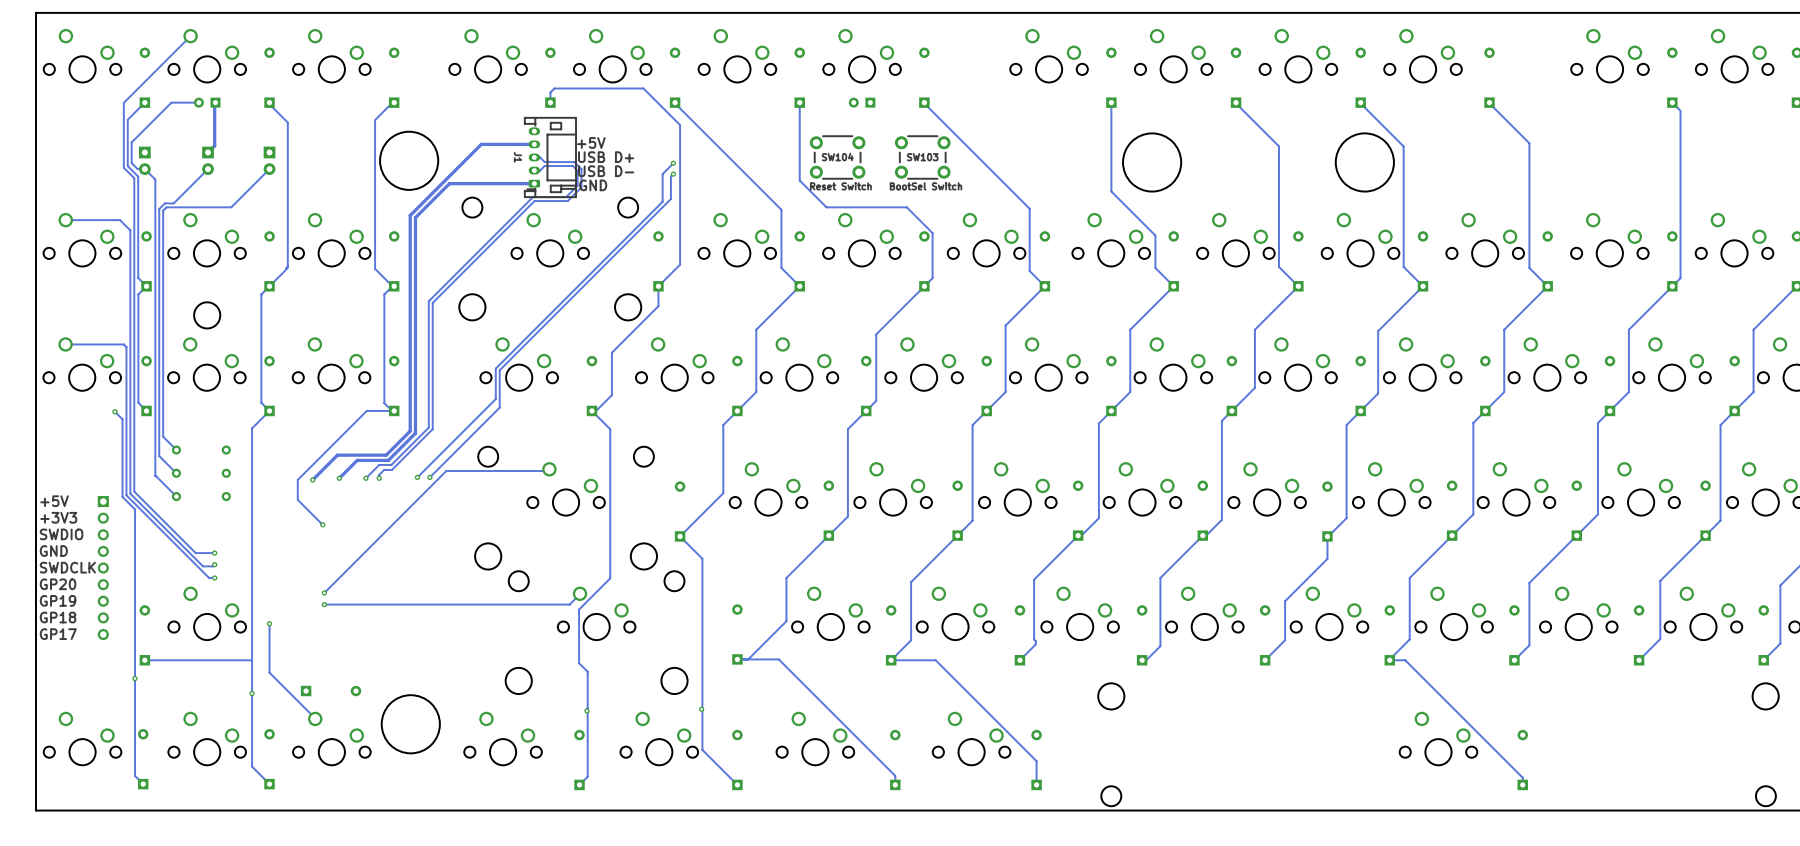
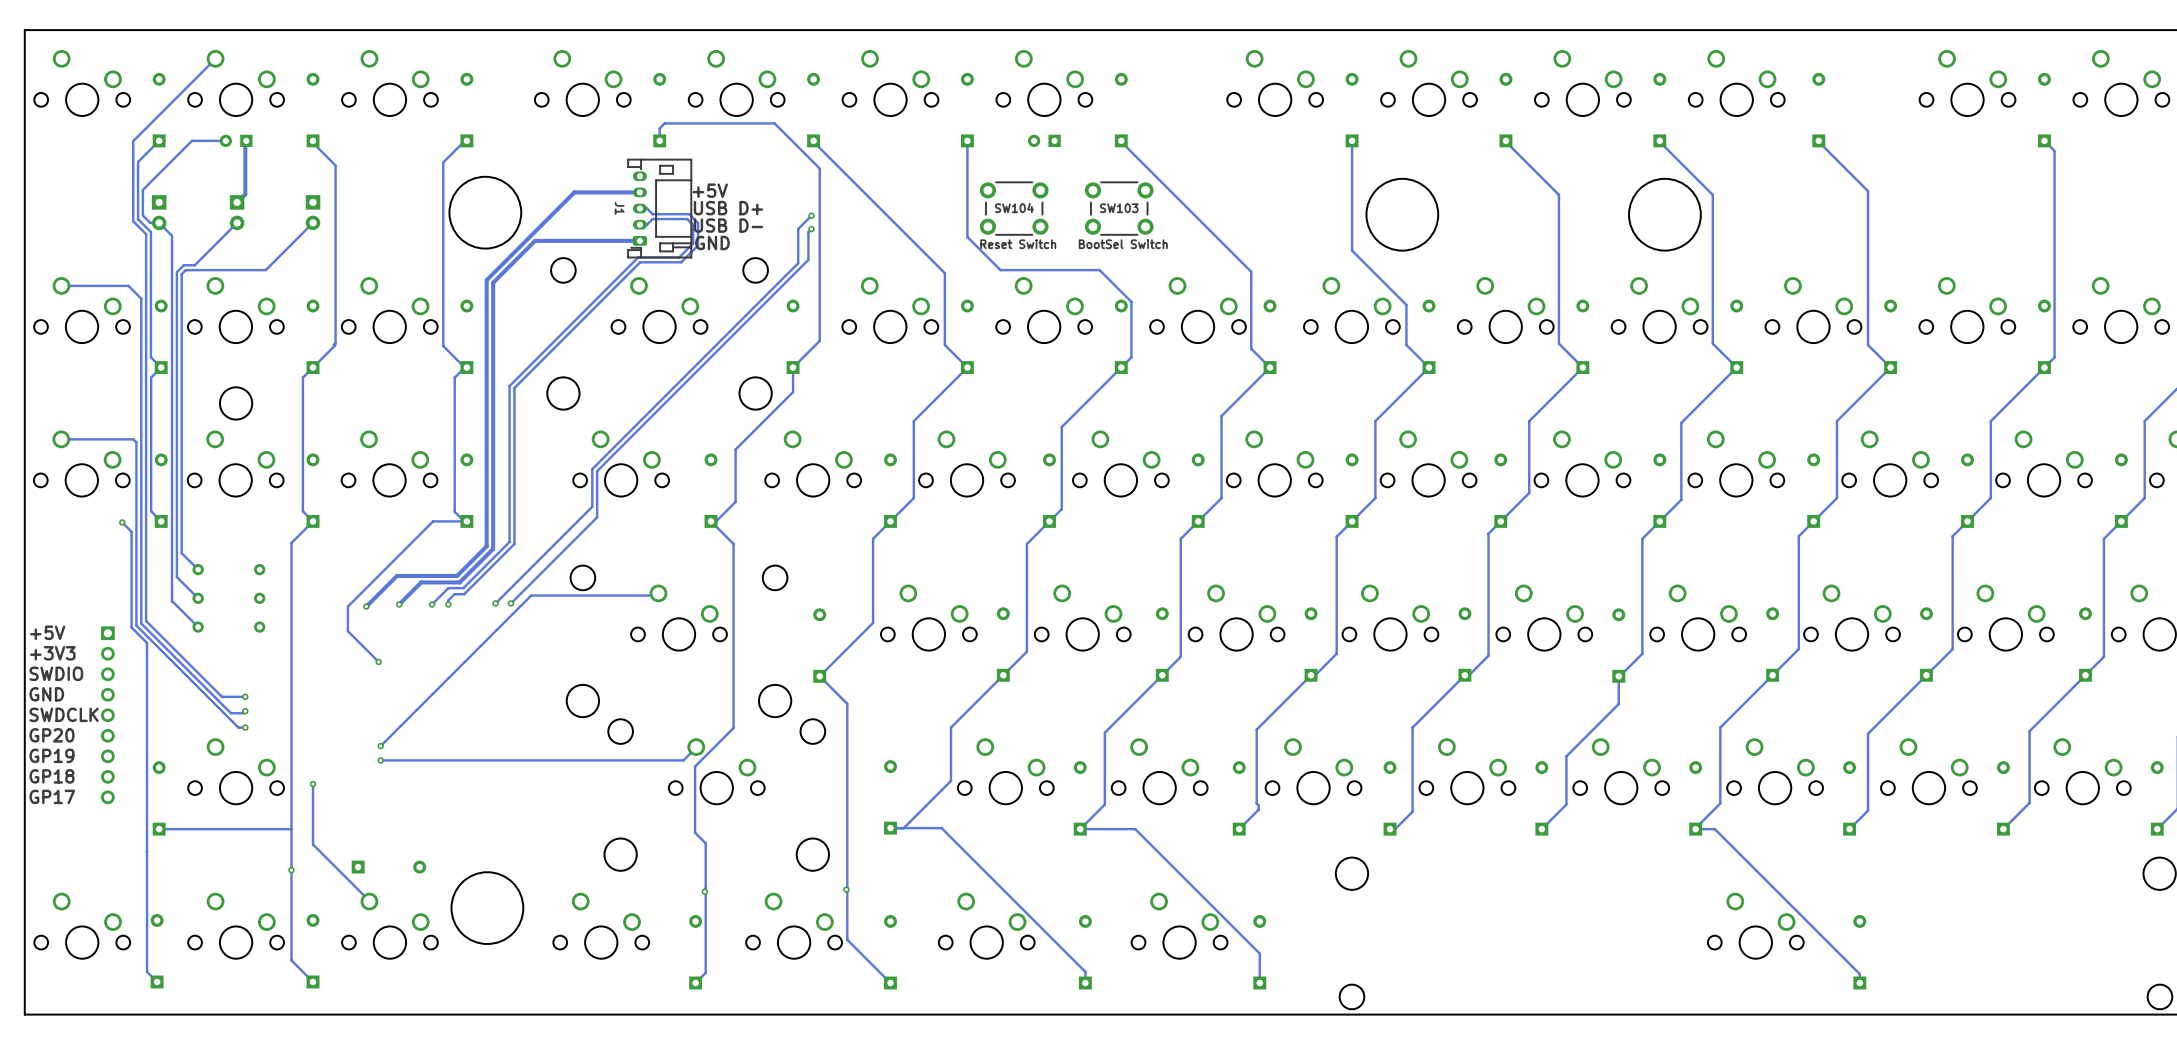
via: (134, 678) -> none

